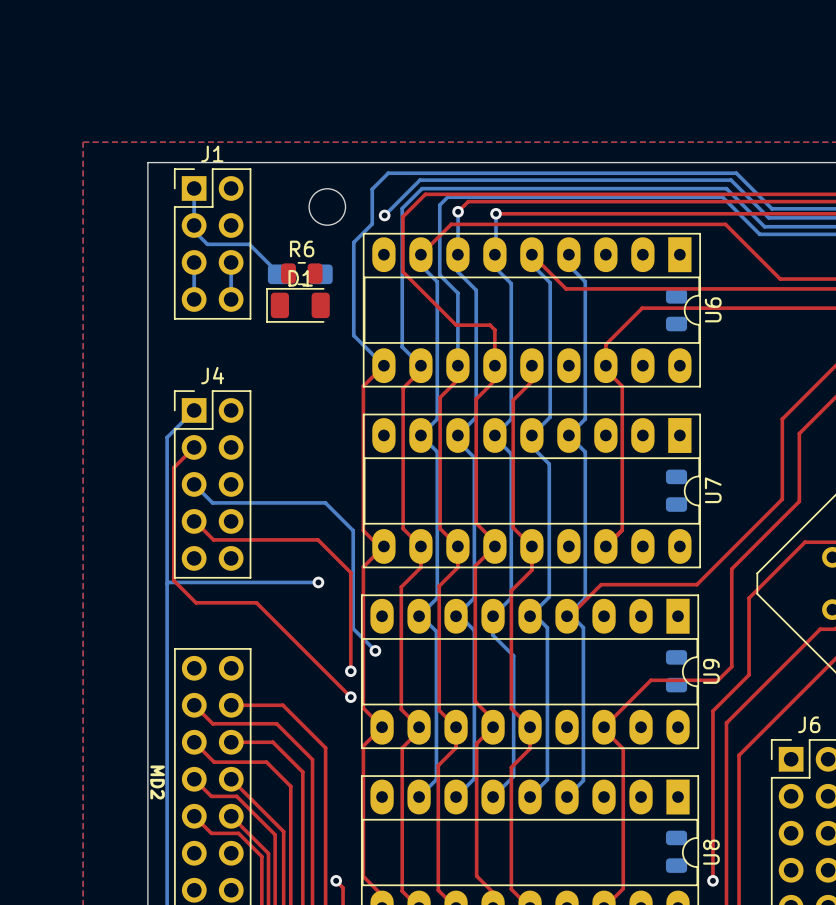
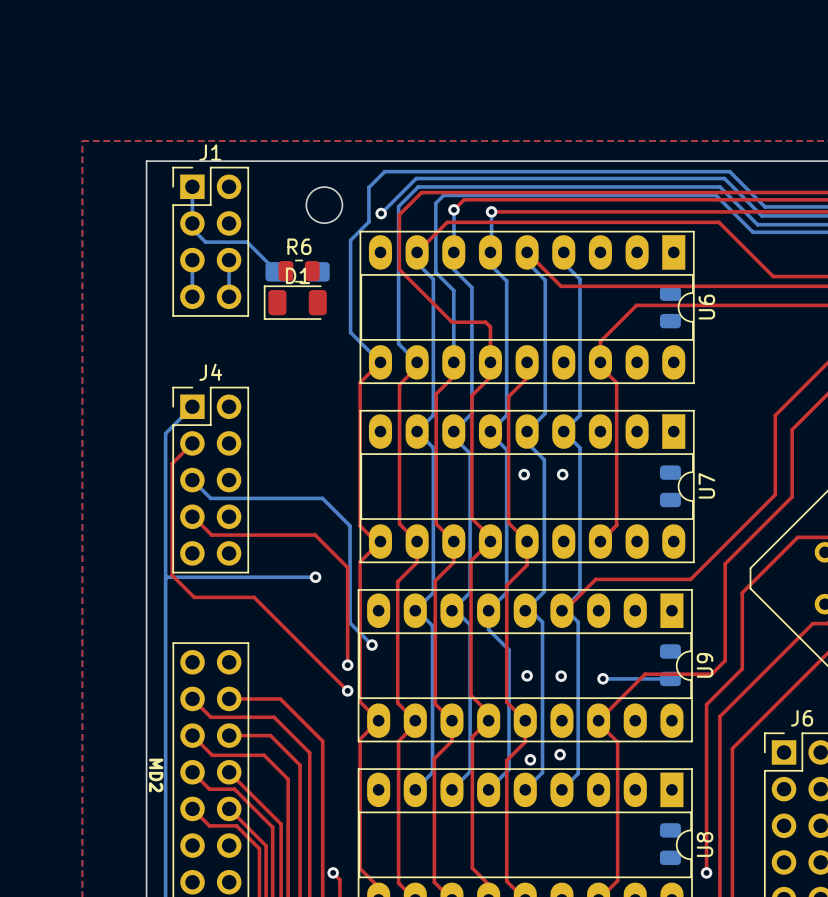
via: none -> (524, 474)
via: none -> (562, 474)
via: none -> (527, 675)
via: none -> (561, 676)
via: none -> (603, 678)
bottom track: none -> (603, 678) (670, 678)
via: none -> (560, 754)
via: none -> (530, 759)

